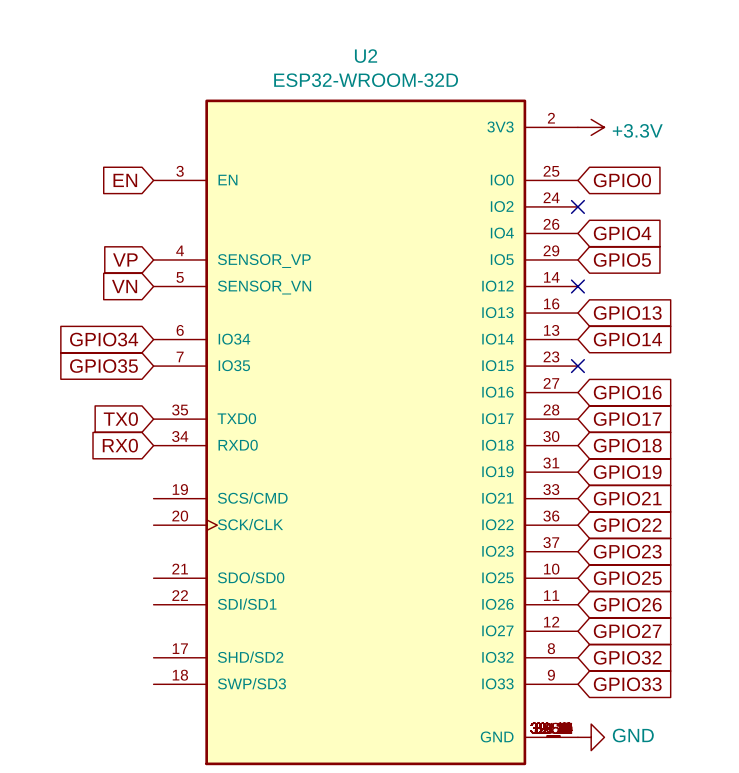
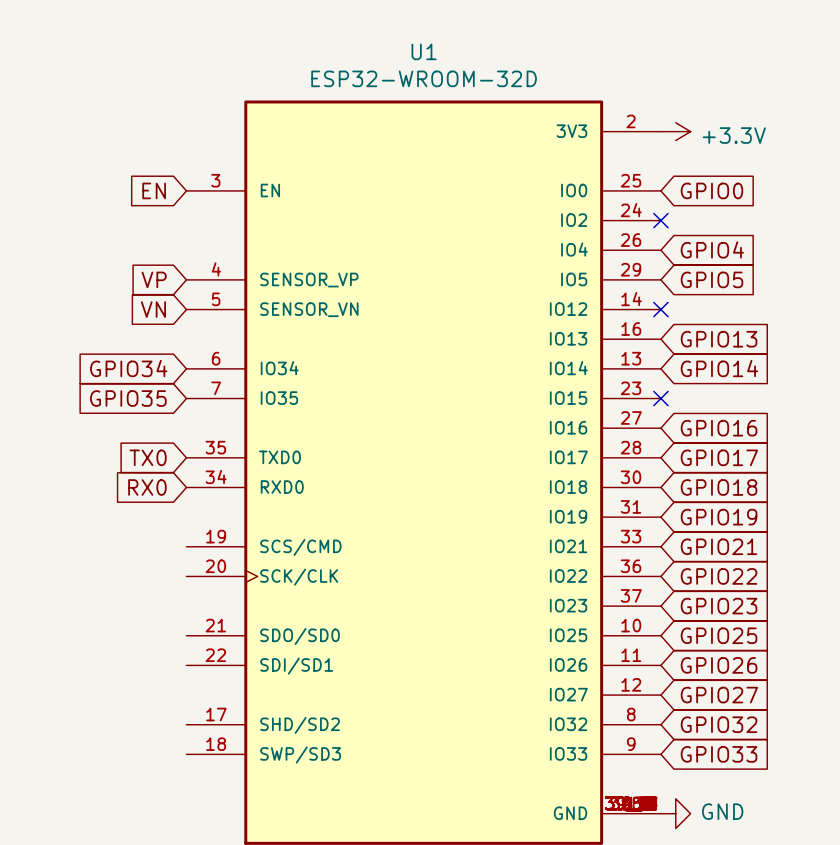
U2 name: U2 (366, 56) -> U1 (424, 51)

